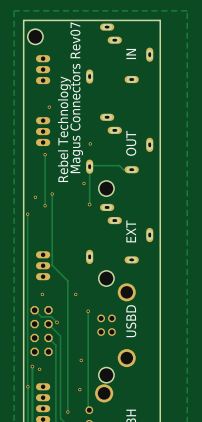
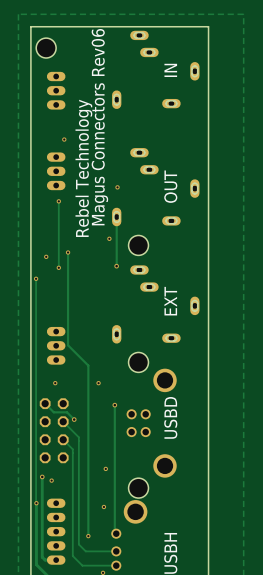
text: Magus Connectors Rev07 (76, 97) -> Magus Connectors Rev06 (99, 127)
track: (89, 166) (119, 165) (123, 169) (131, 169) -> none

